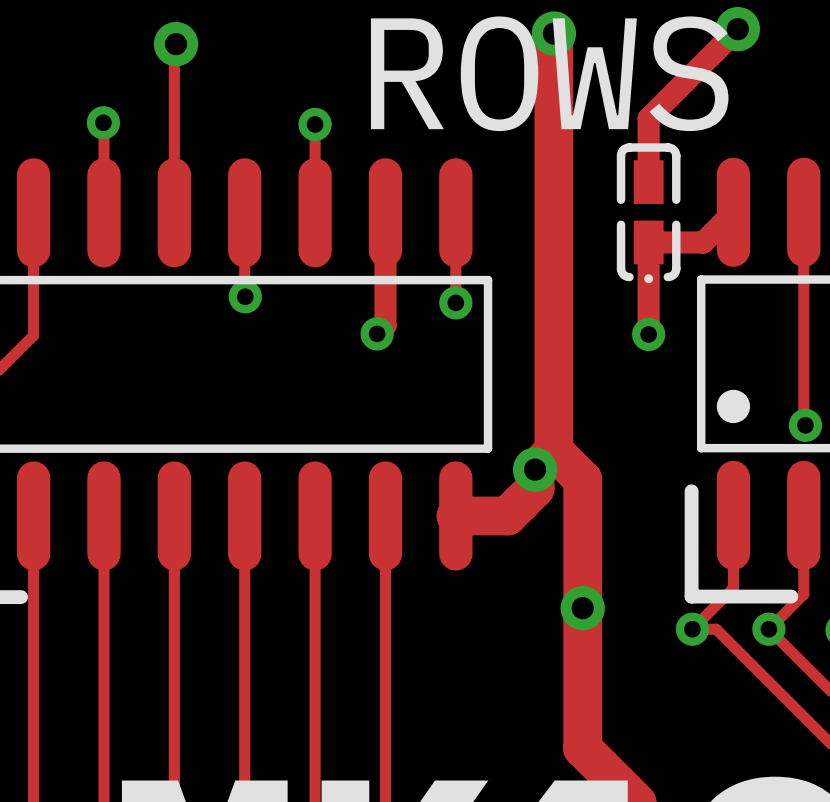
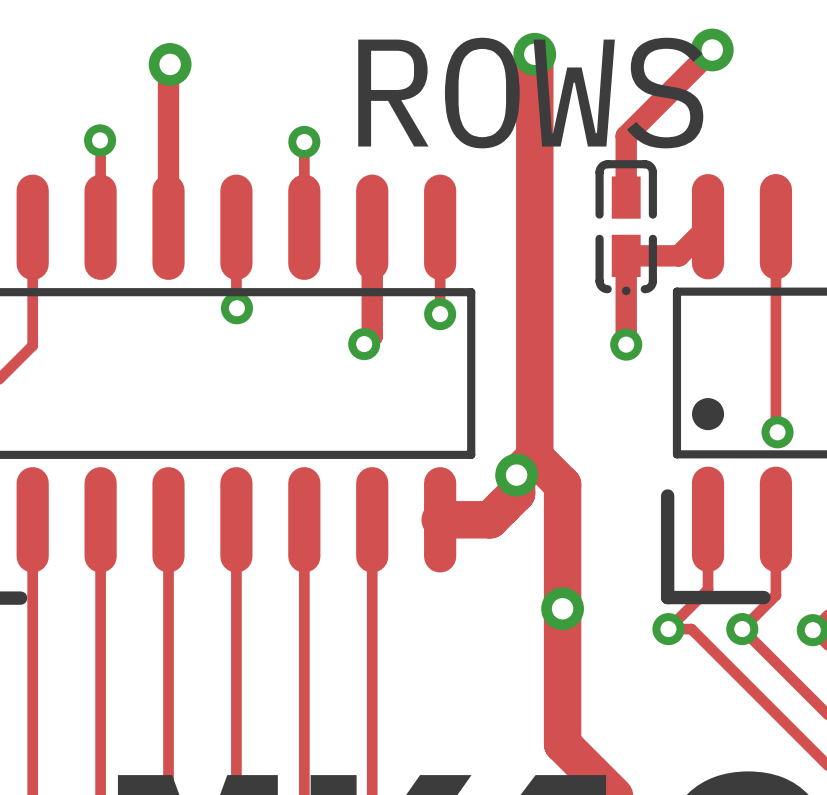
track width: thin (176, 44) (174, 45) (174, 212) -> thick (170, 64) (168, 66) (168, 227)

